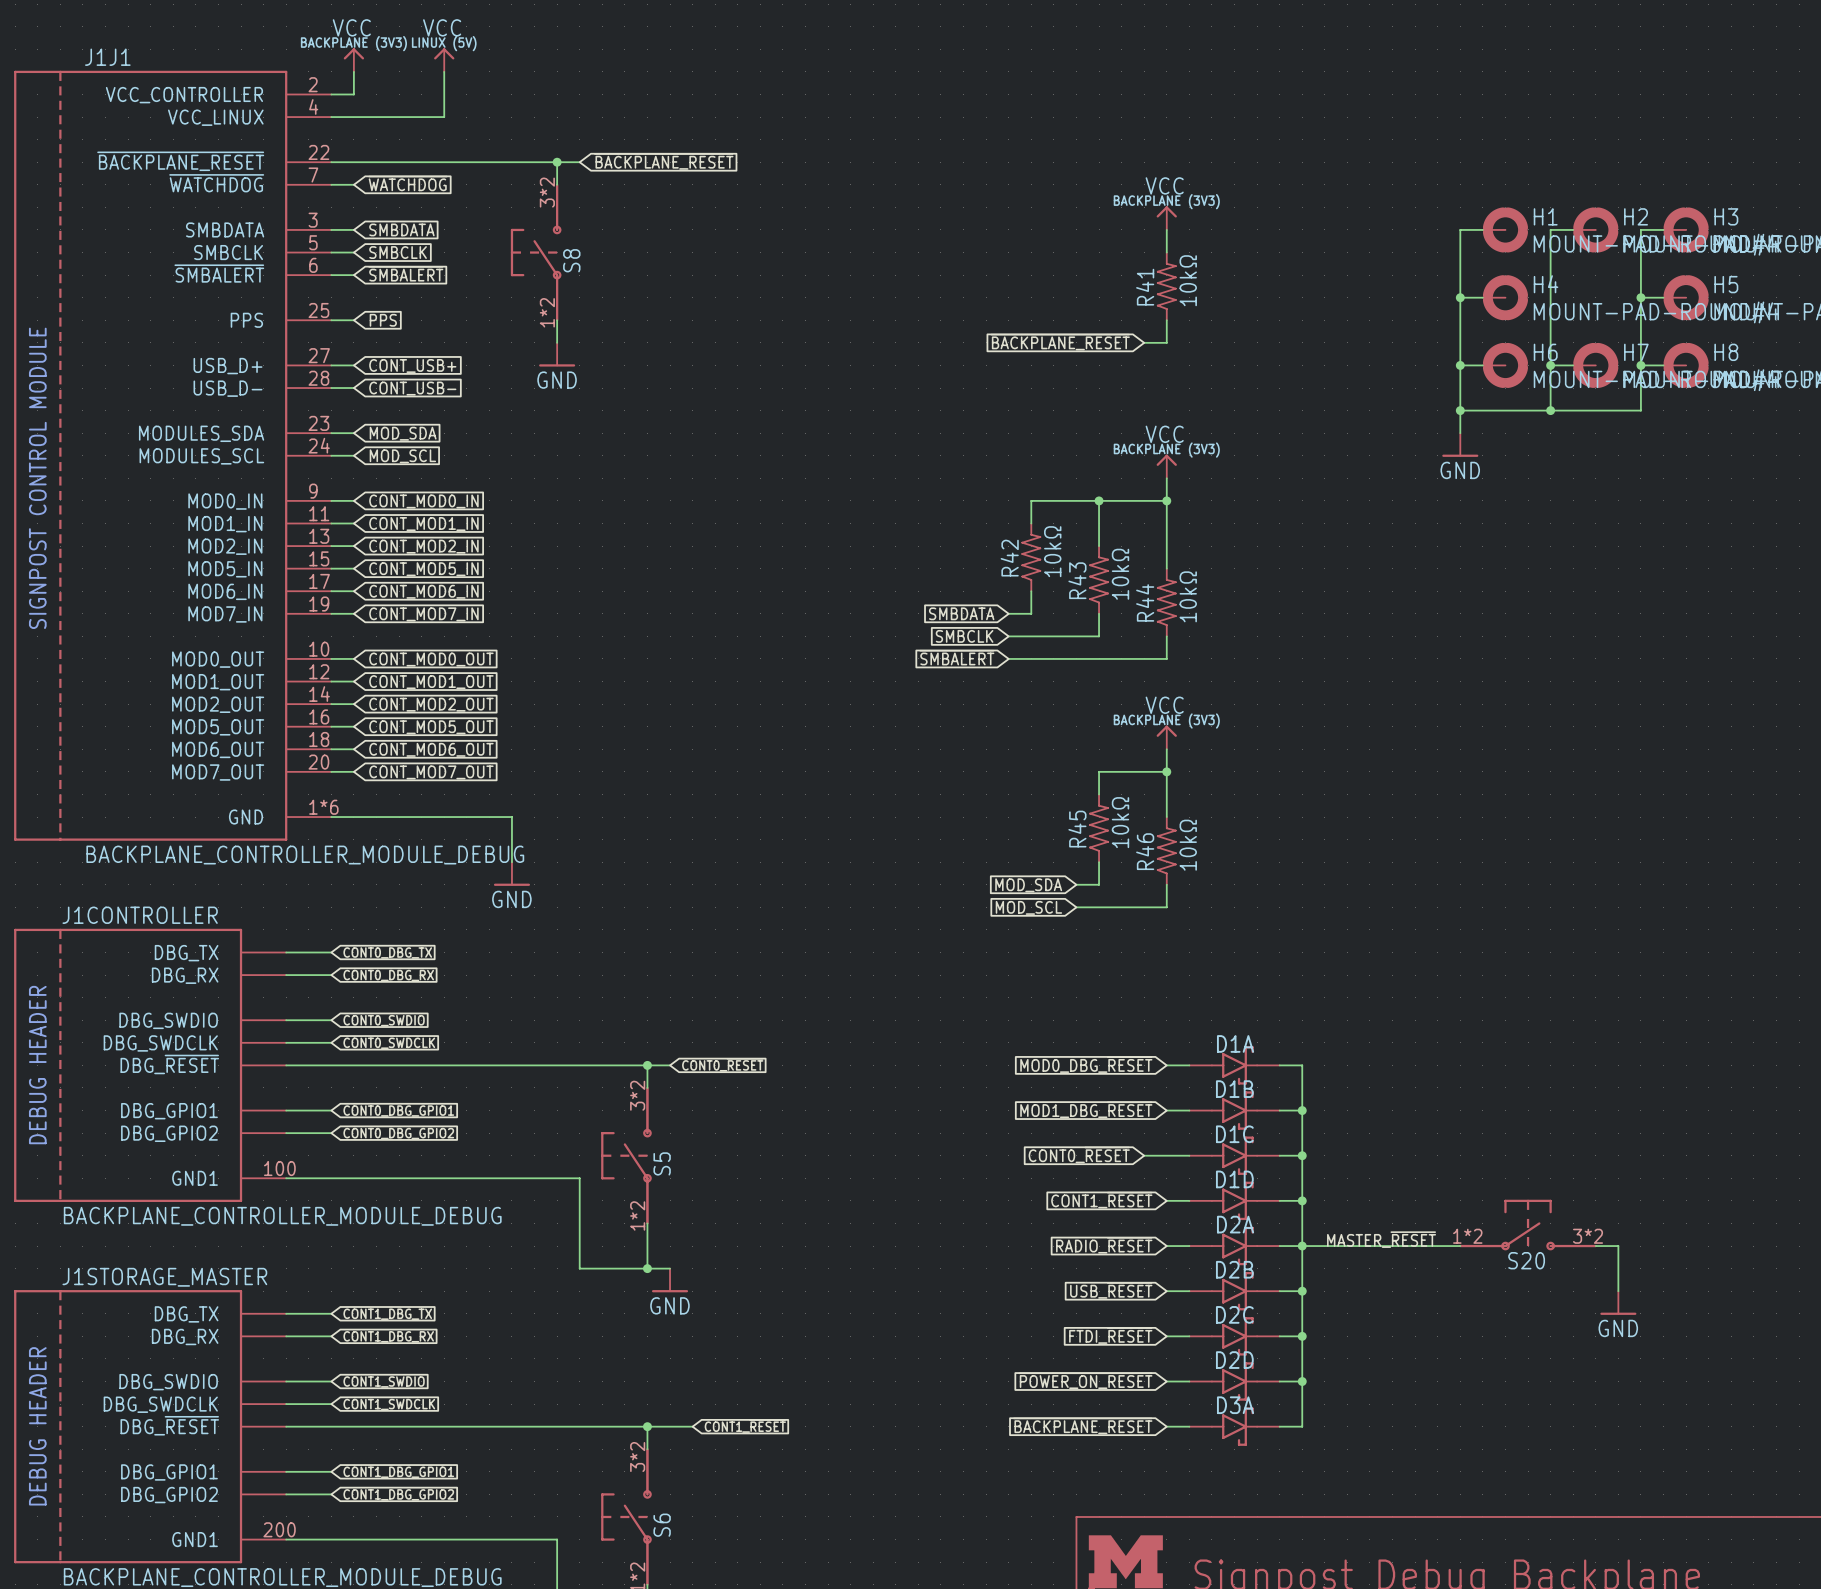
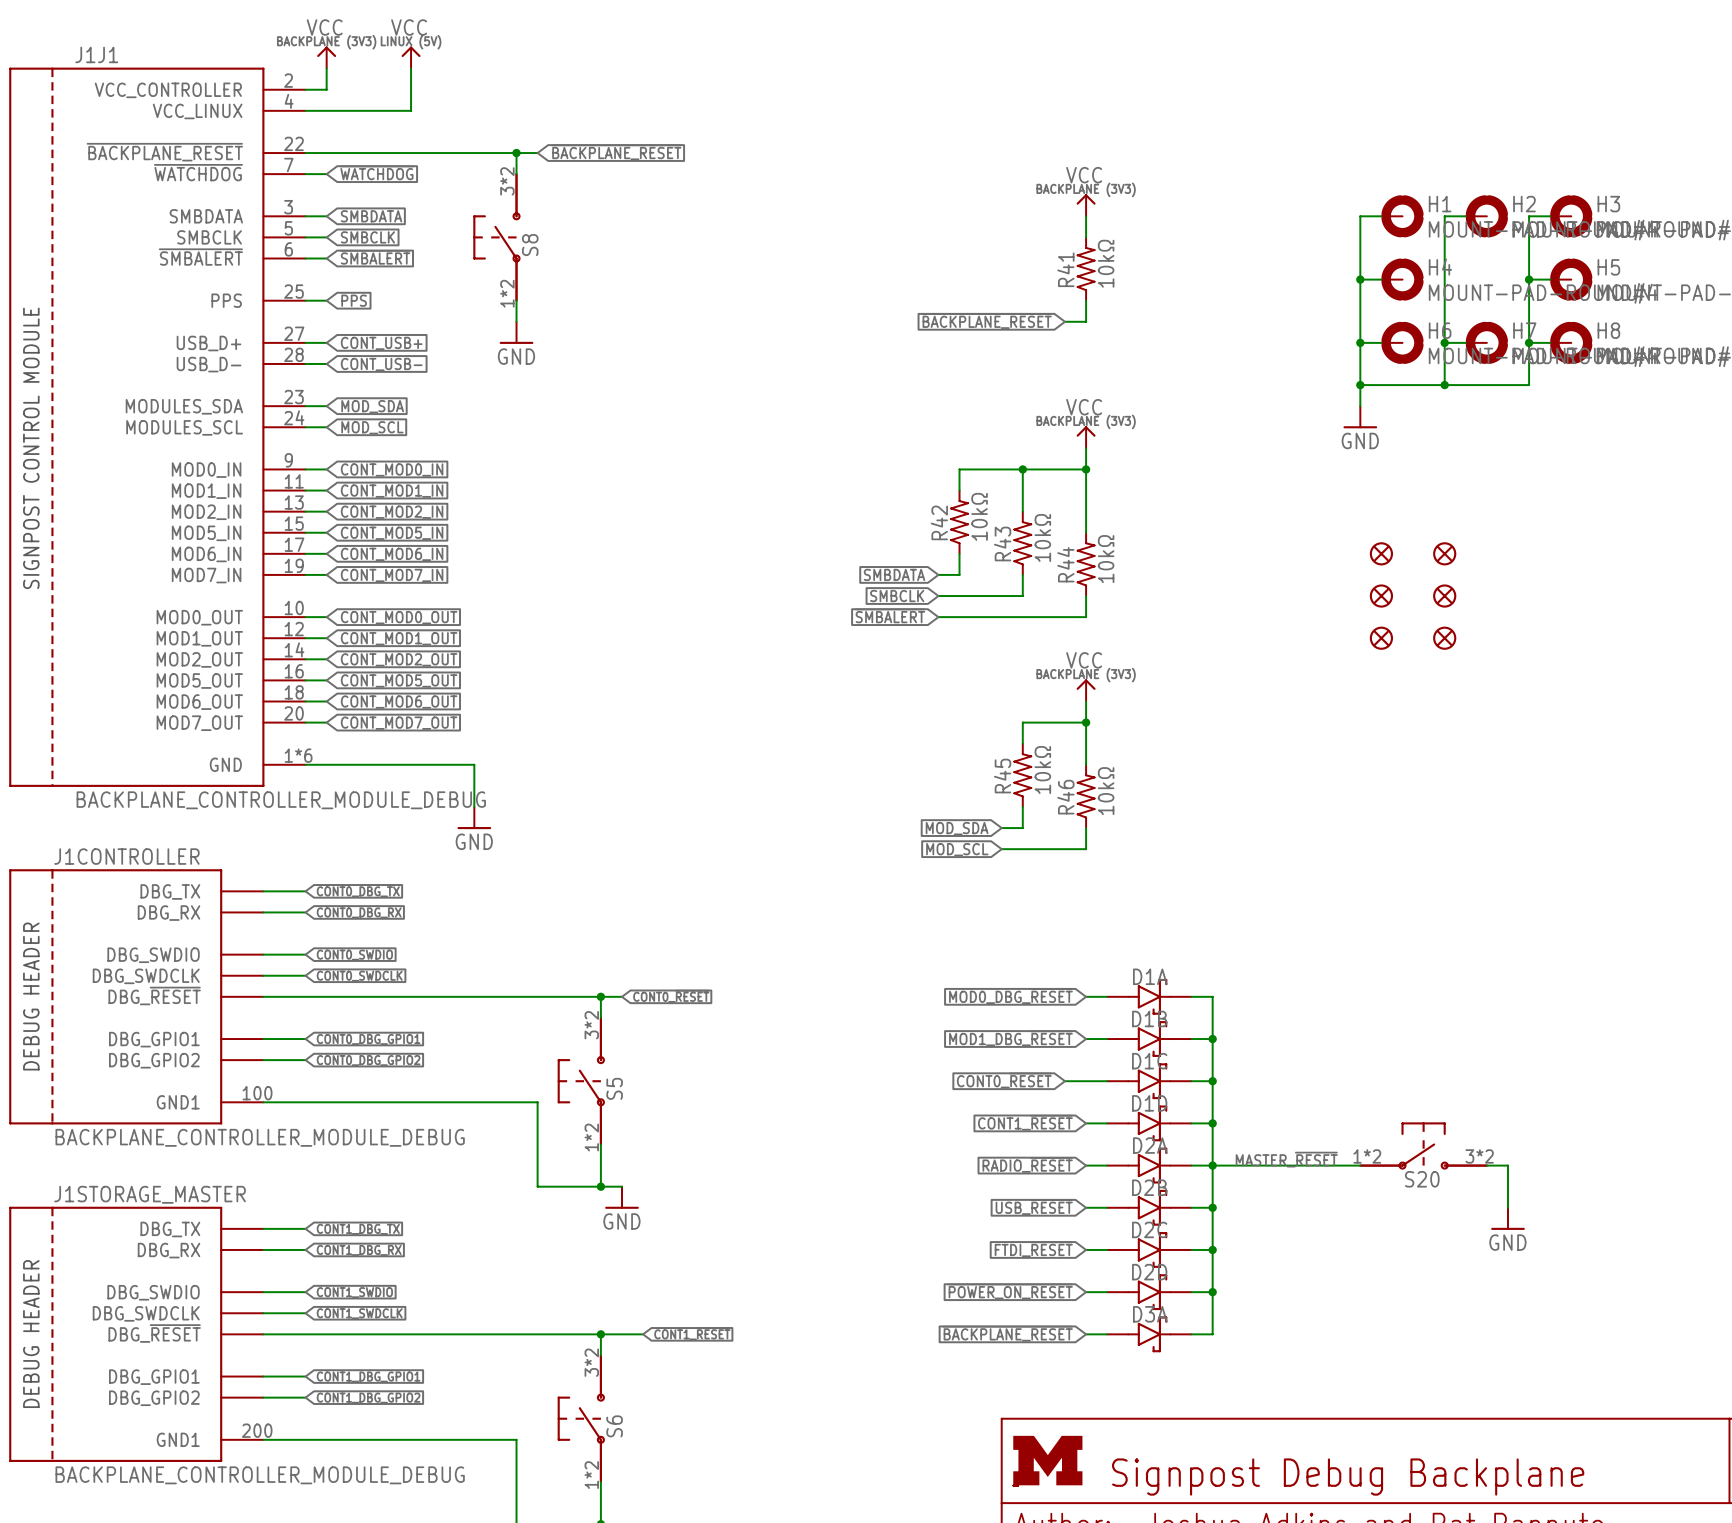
part: none -> (1381, 553)
part: none -> (1444, 553)
part: none -> (1381, 596)
part: none -> (1444, 596)
part: none -> (1381, 638)
part: none -> (1444, 638)

